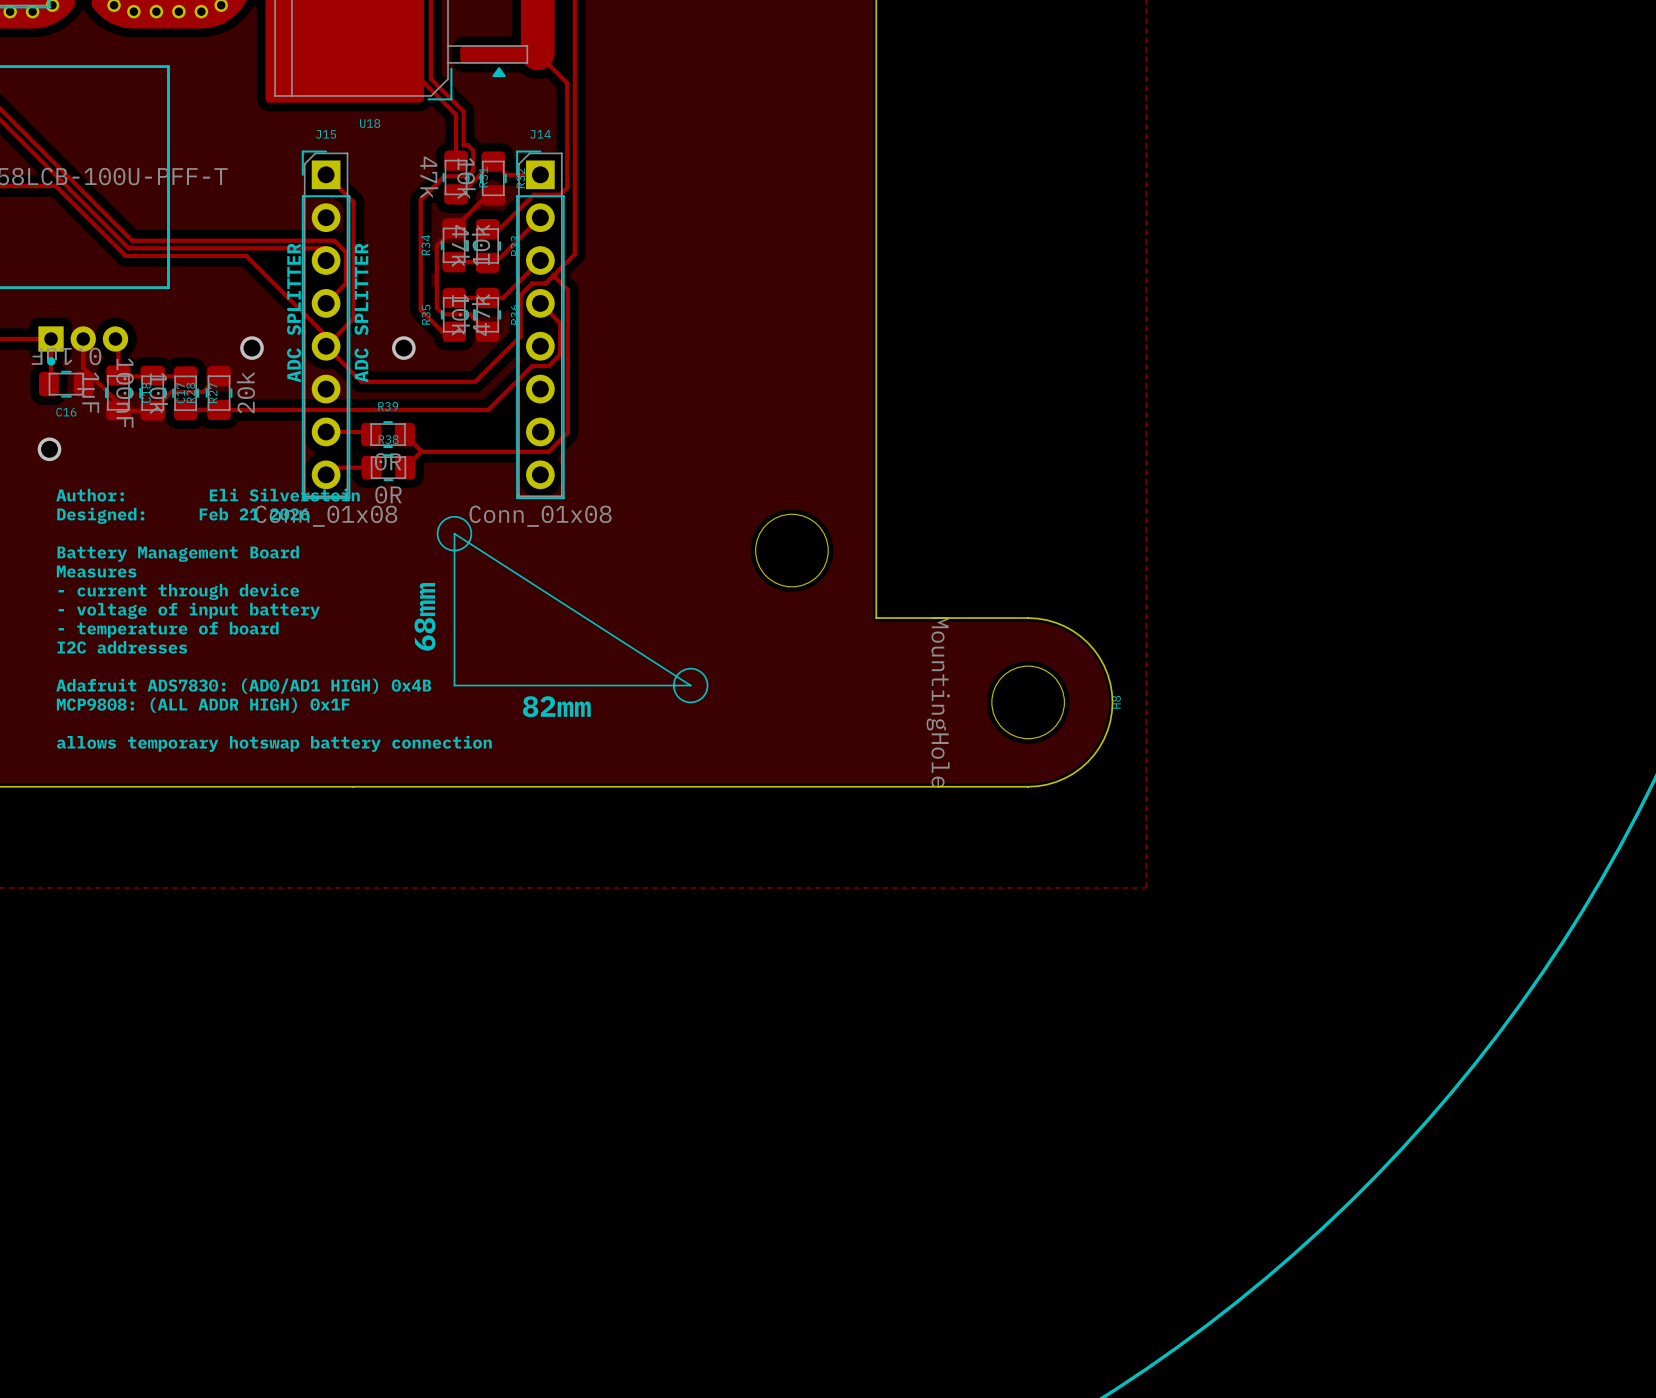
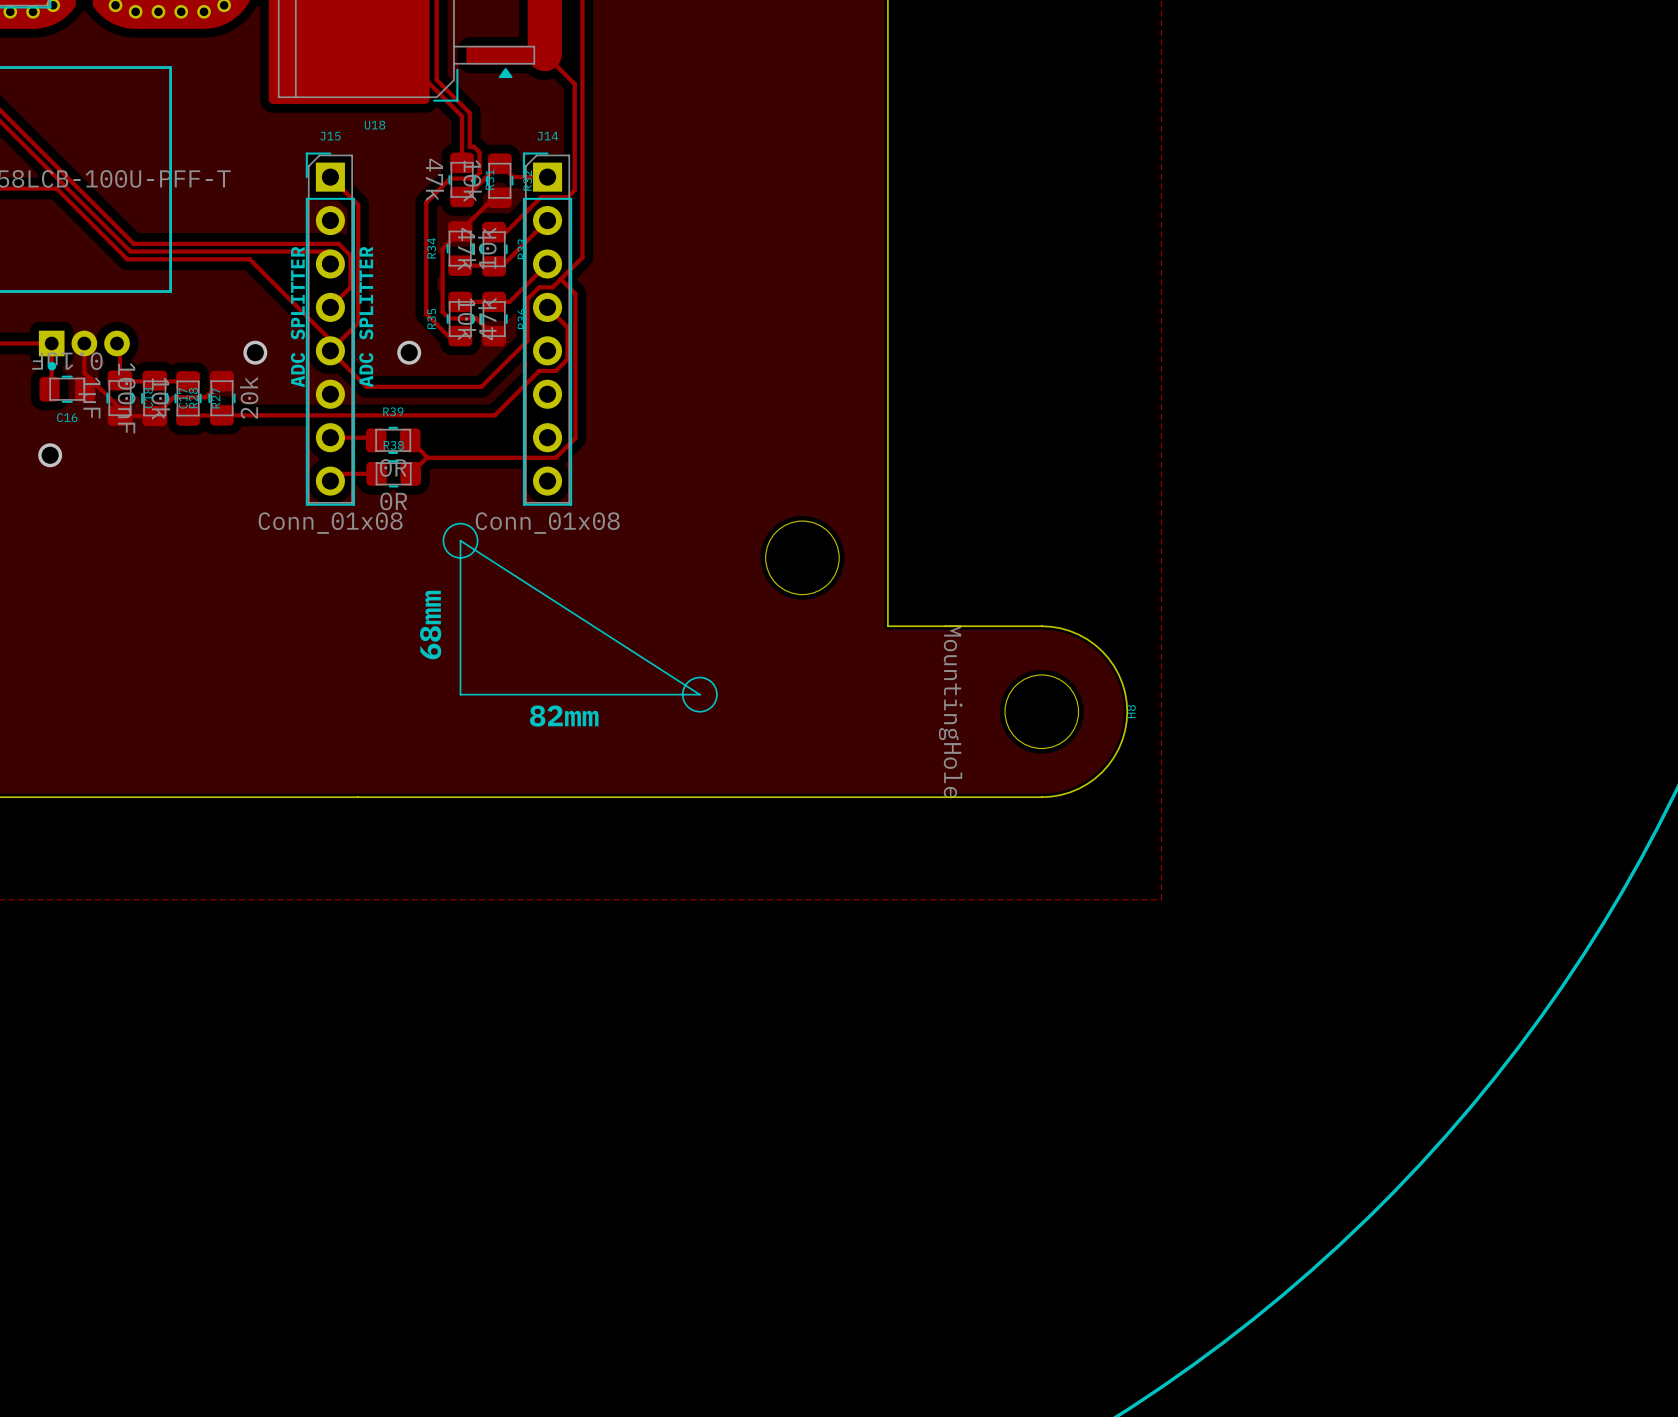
text: Author: Eli Silverstein (208, 495) -> none
text: Designed: Feb 21 2026 (183, 515) -> none
text: Battery Management Board (178, 553) -> none
text: Measures (96, 571) -> none
text: - current through device (178, 591) -> none
text: - voltage of input battery (189, 610) -> none
text: - temperature of board (168, 629) -> none
text: I2C addresses (122, 647) -> none
text: Adafruit ADS7830: (AD0/AD1 HIGH) 0x4B (243, 686) -> none
text: MCP9808: (ALL ADDR HIGH) 0x1F (203, 705) -> none
text: allows temporary hotswap battery connection (274, 743) -> none

